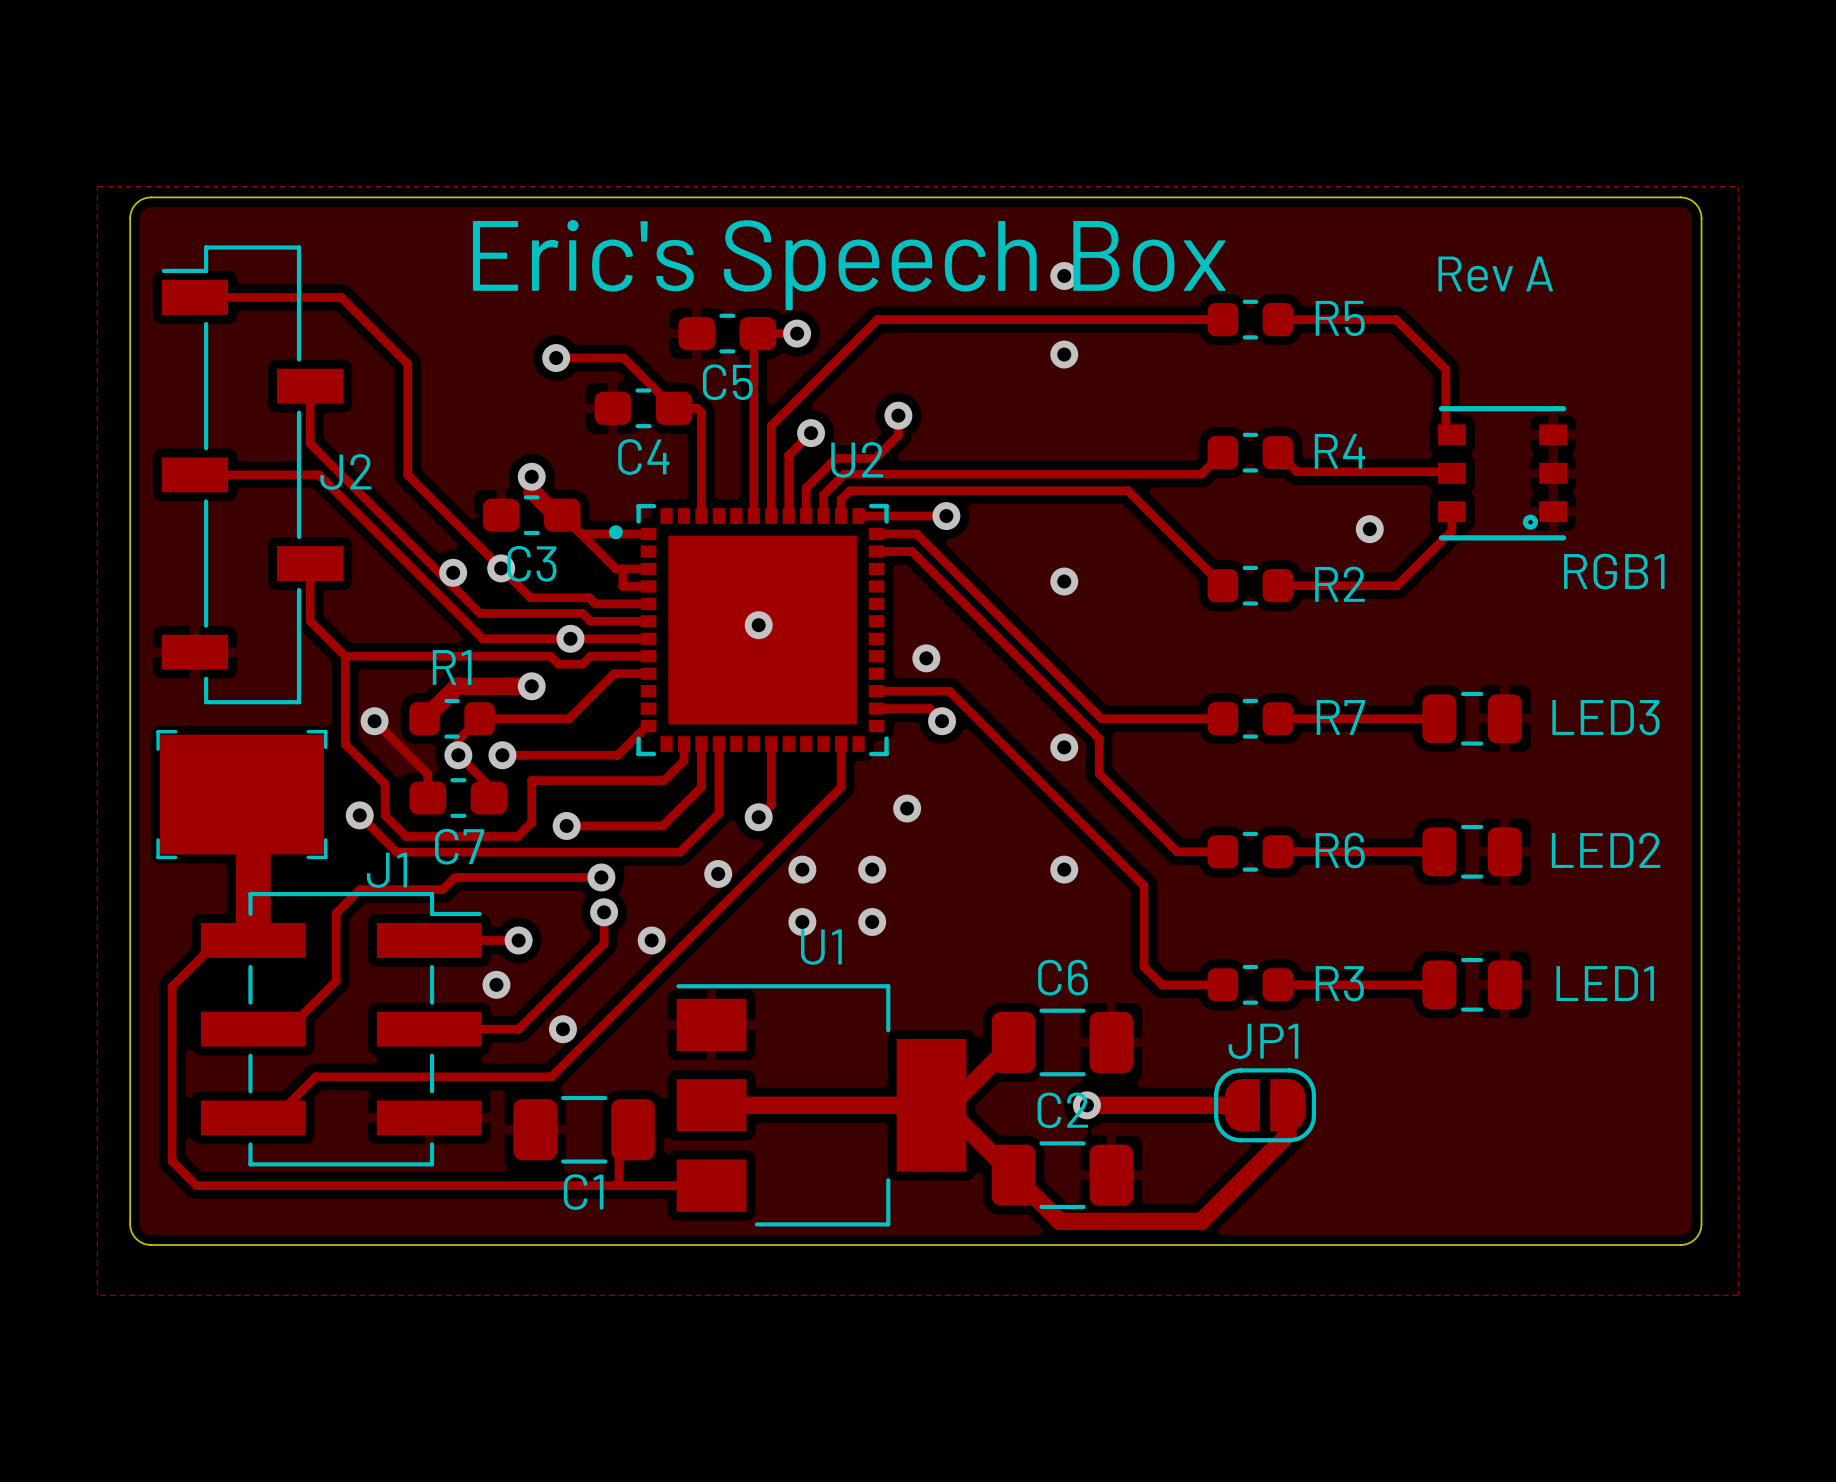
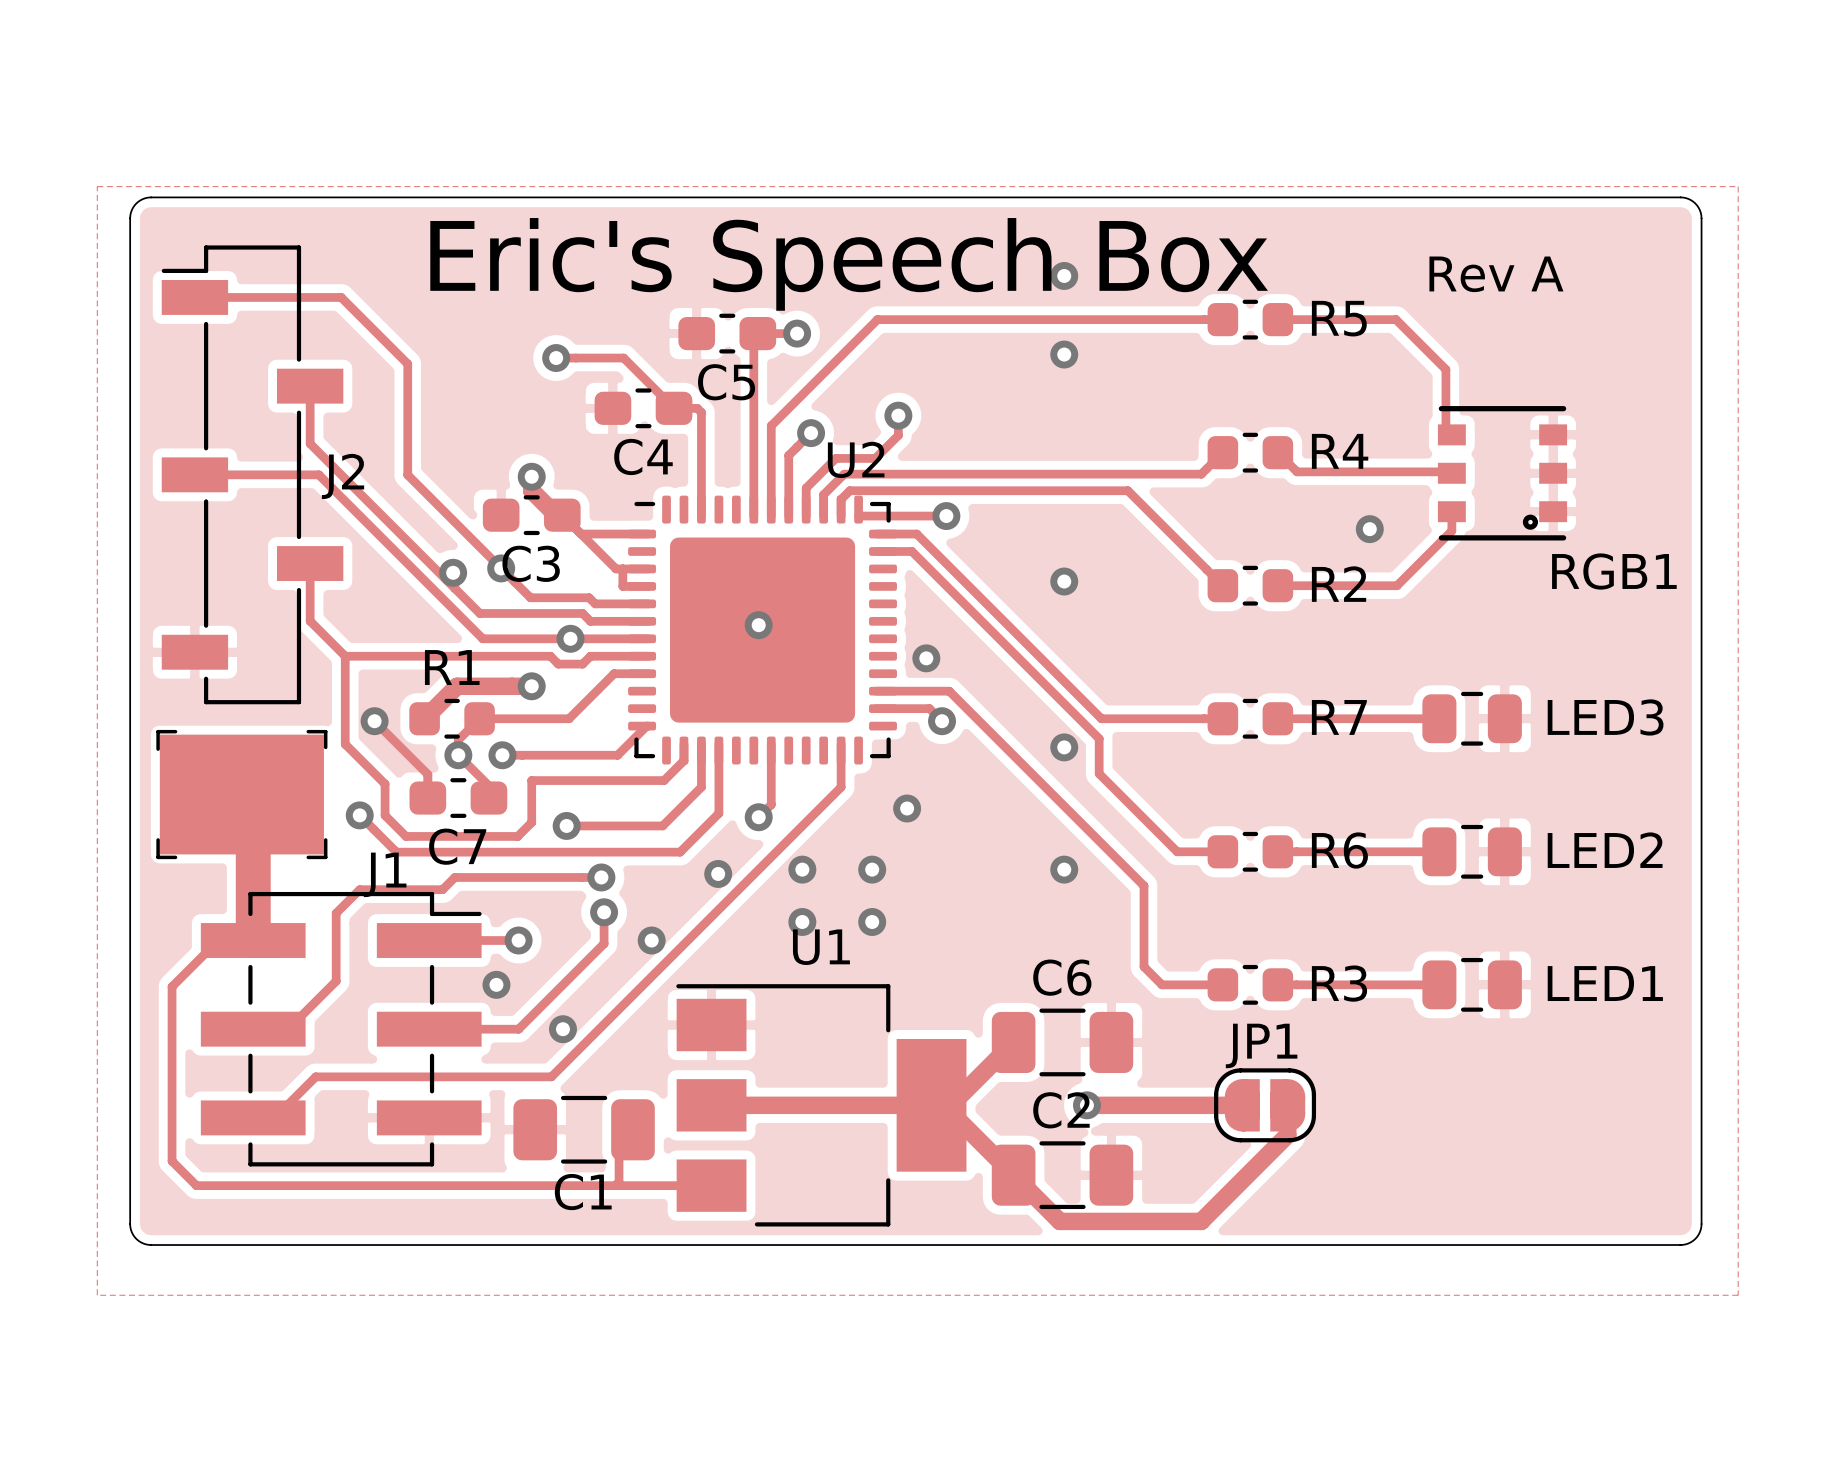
U2 footprint: [608, 503, 889, 757] -> [628, 495, 897, 765]

